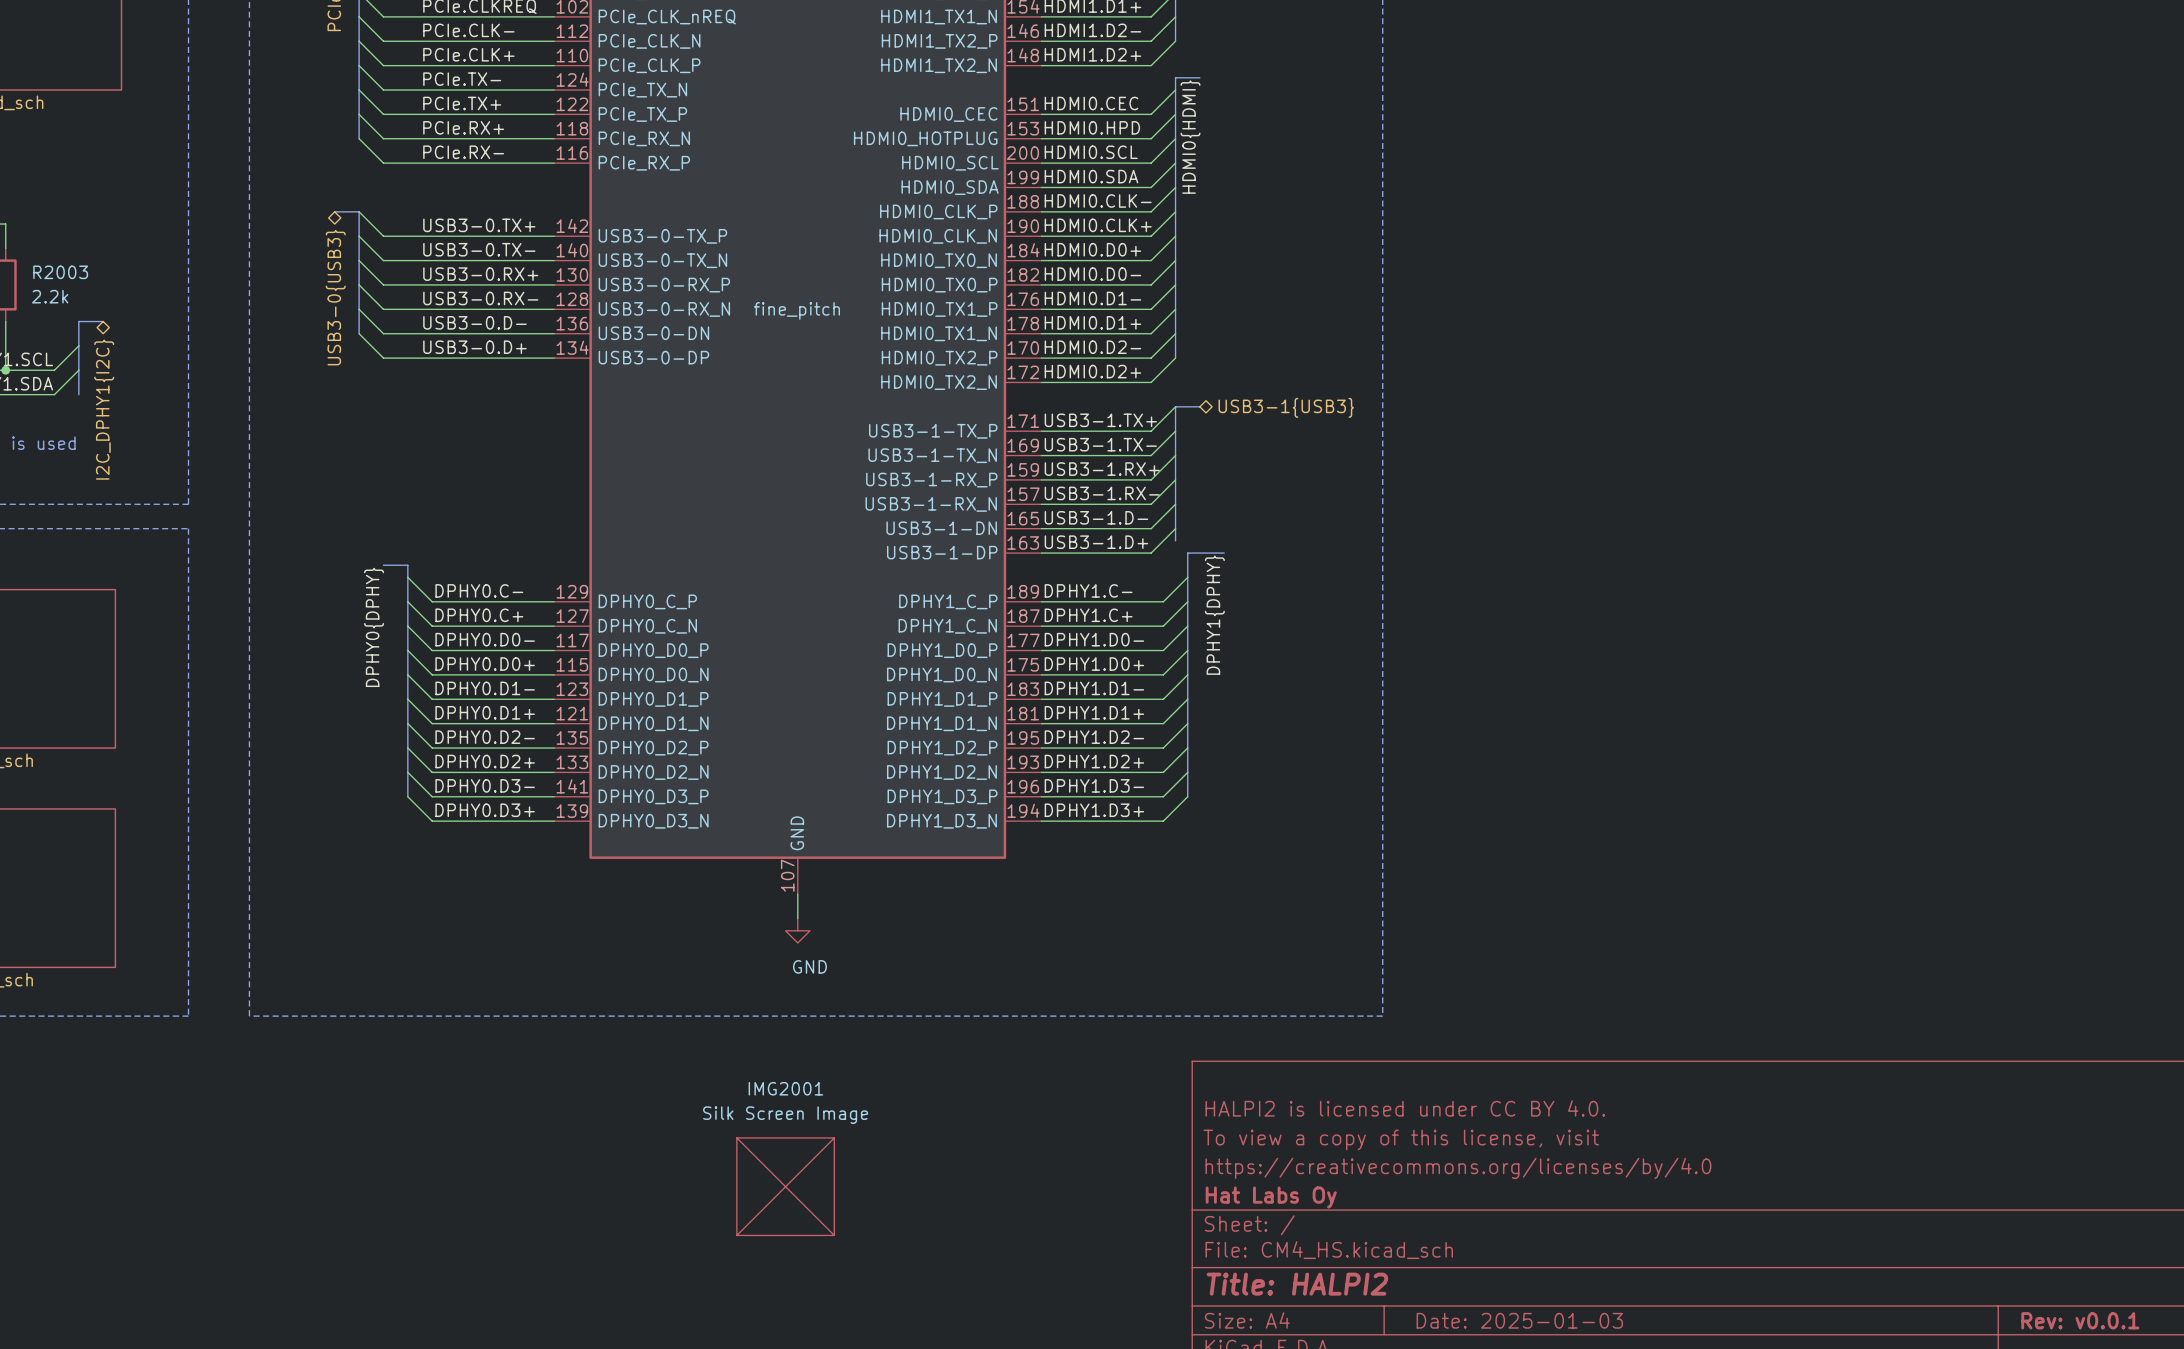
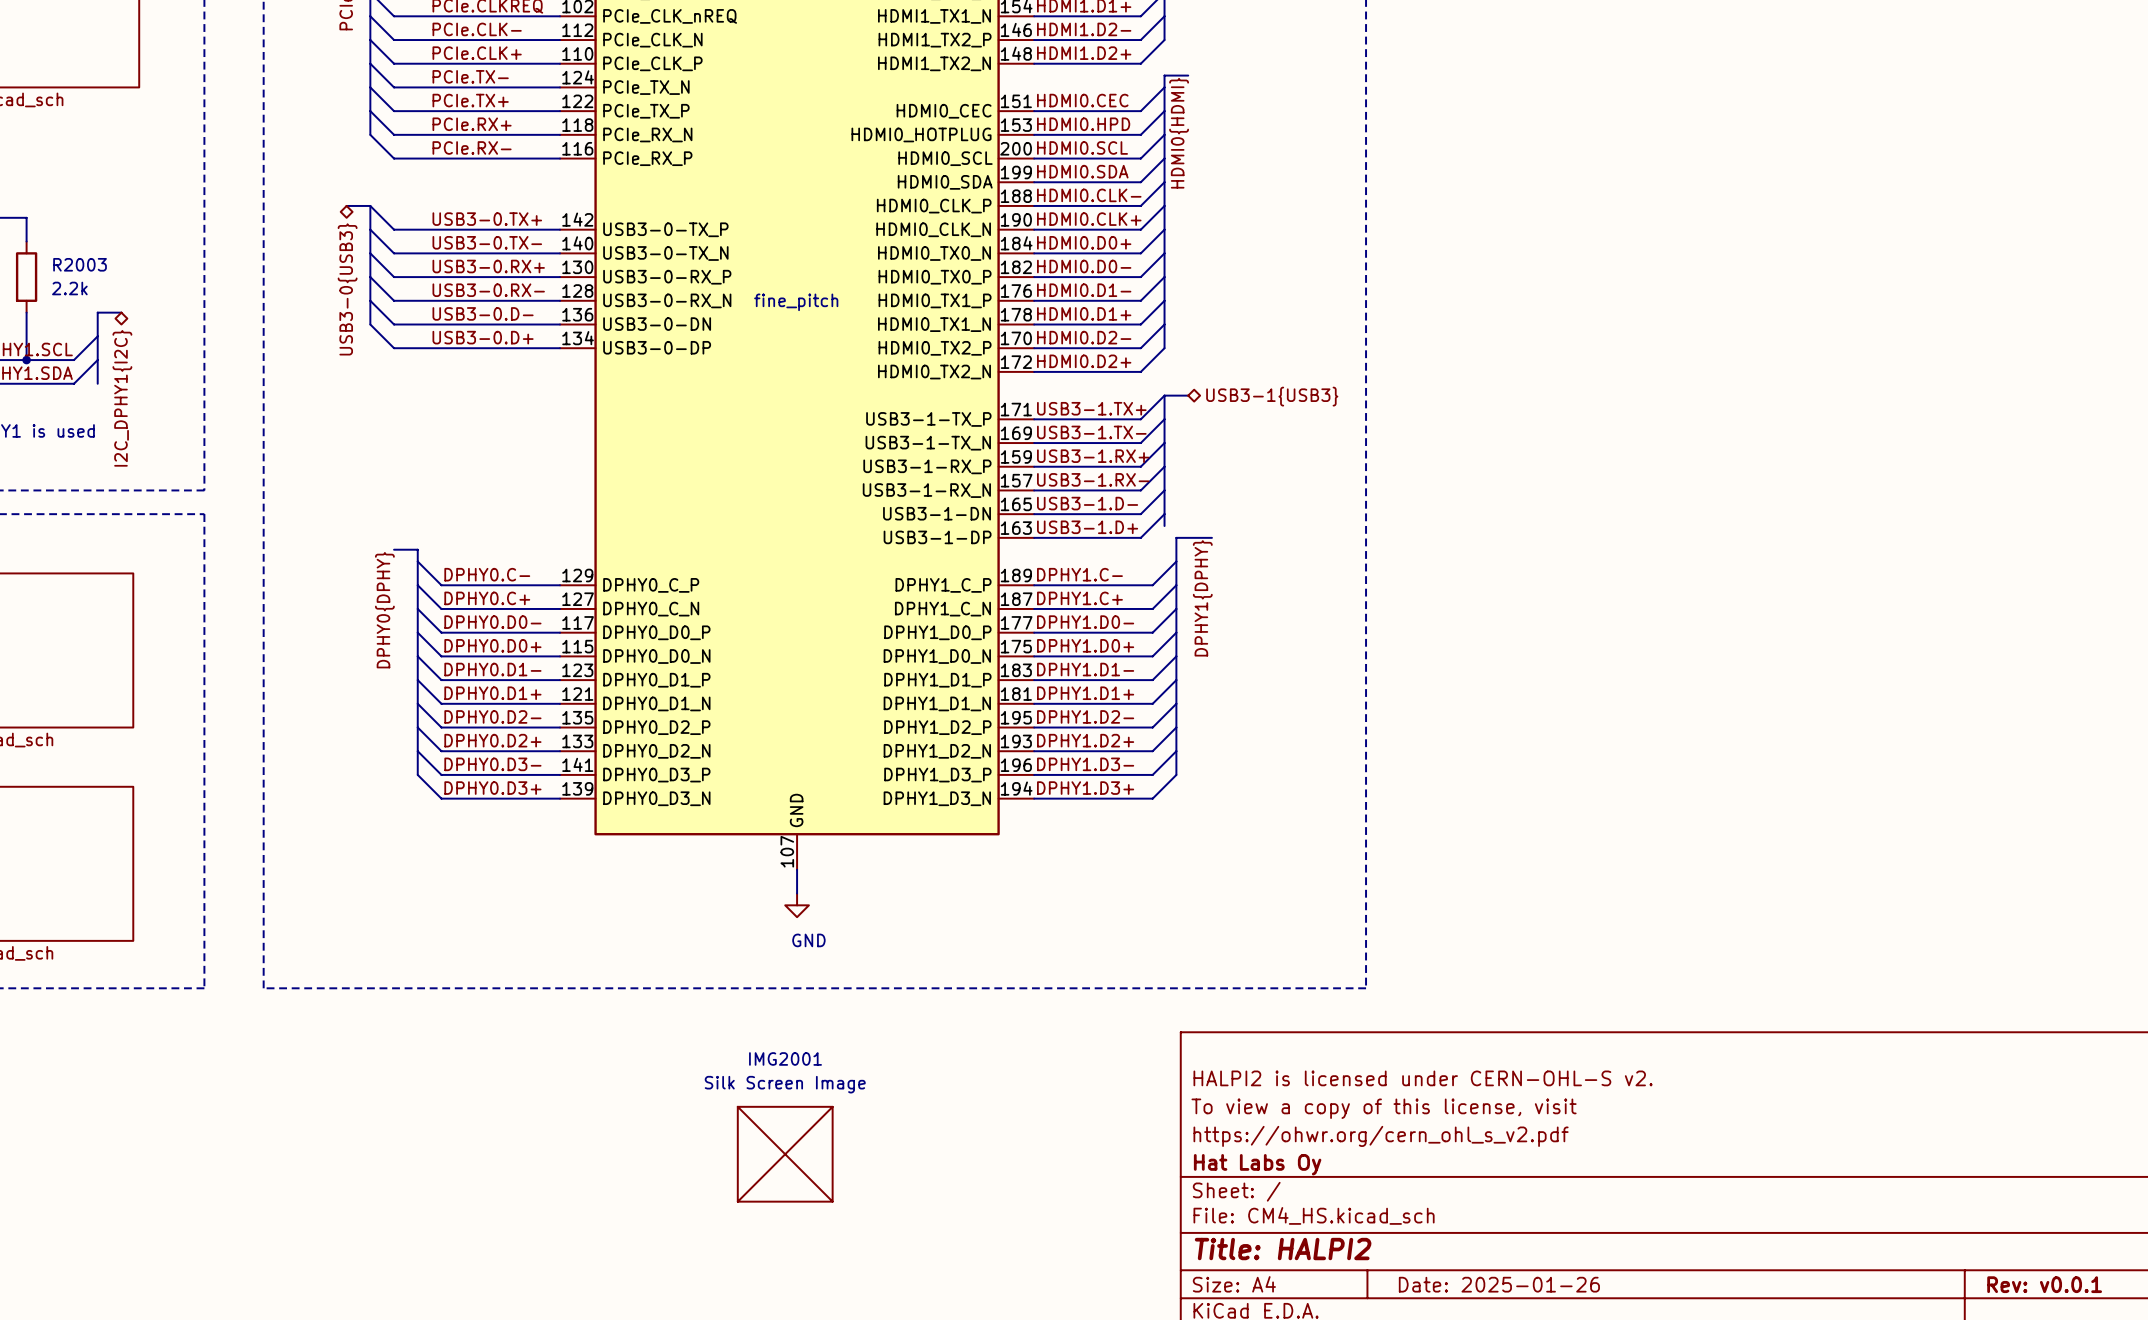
title block: HALPI2 is licensed under CC BY 4.0. (1405, 1108) -> HALPI2 is licensed under CERN-OHL-S v2. (1423, 1078)
title block: https://creativecommons.org/licenses/by/4.0 (1458, 1168) -> https://ohwr.org/cern_ohl_s_v2.pdf (1381, 1136)
title block: Date: 2025-01-03 (1519, 1320) -> Date: 2025-01-26 (1499, 1284)

